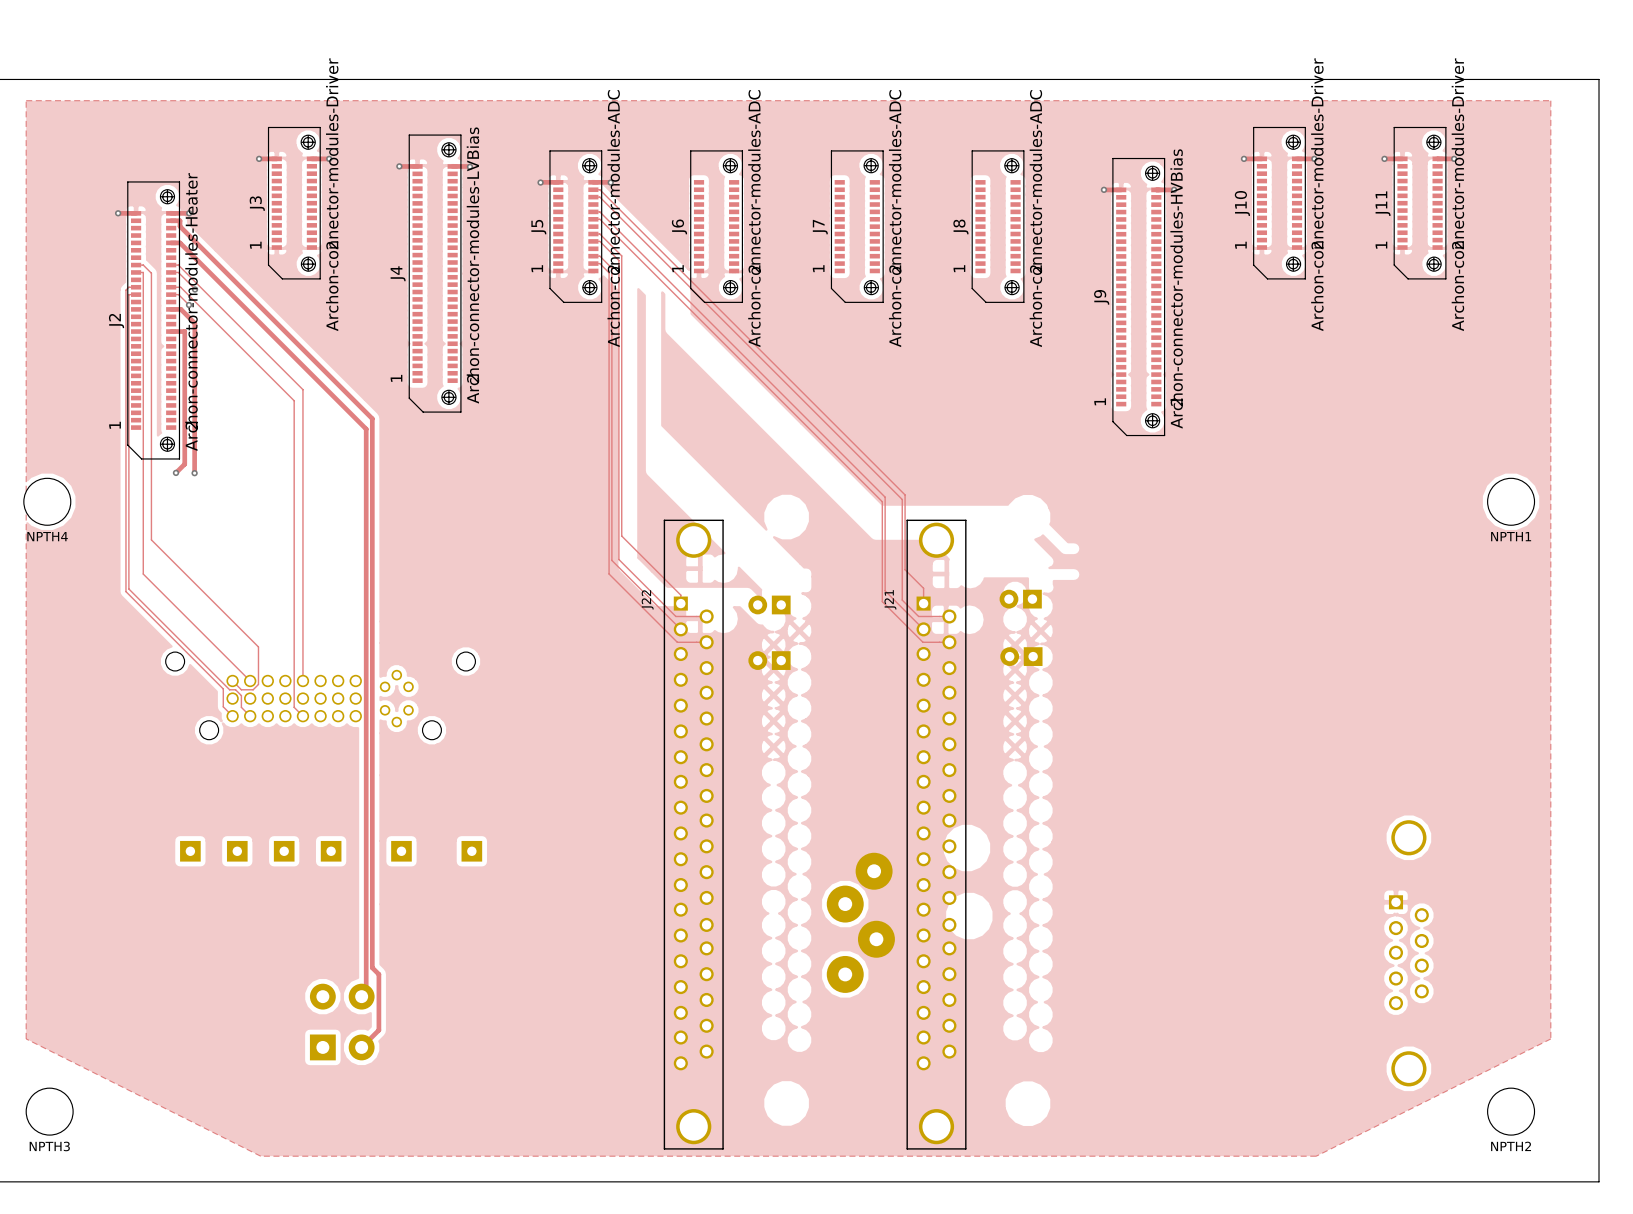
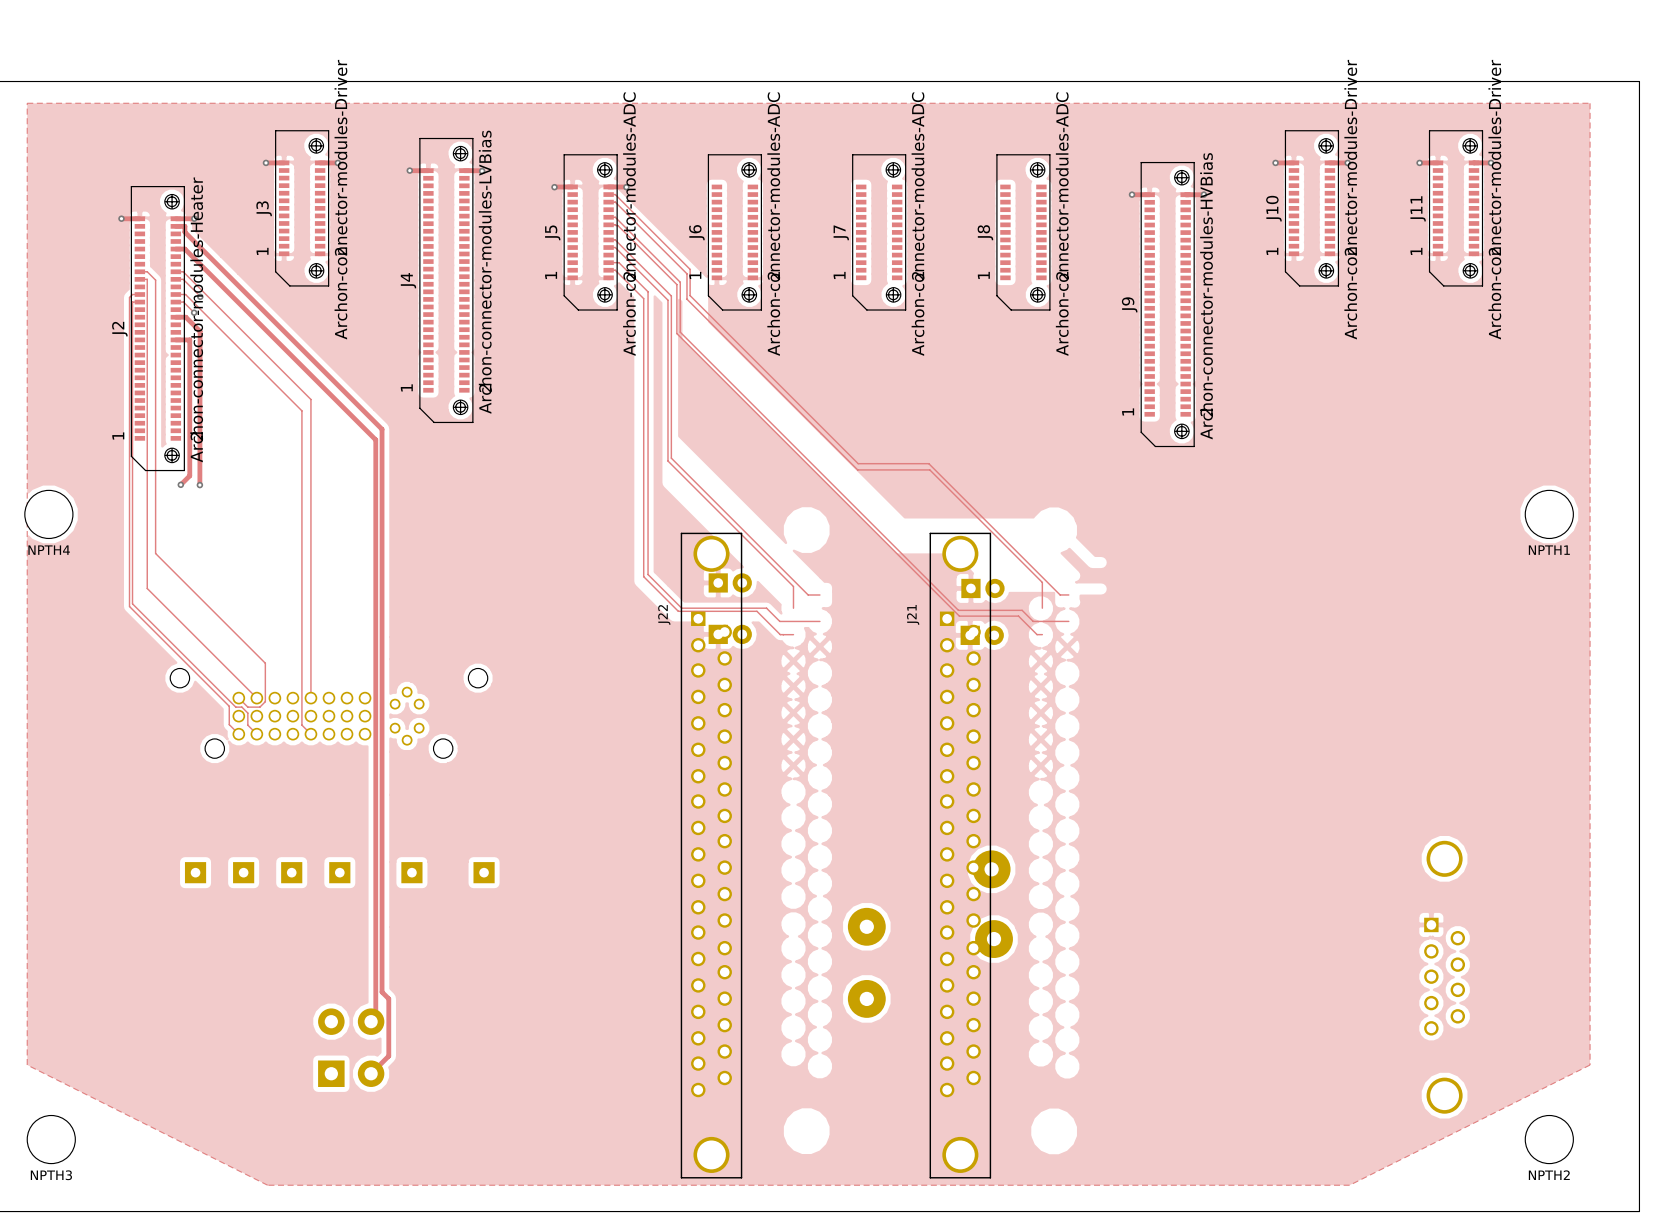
track: (600, 219) (882, 501) (882, 601) (922, 642) (949, 642) -> (616, 225) (676, 284) (676, 333) (959, 616) (1018, 616) (1037, 634) (1042, 634)
track: (621, 255) (621, 536) (680, 595) (680, 603) -> (637, 262) (671, 296) (671, 458) (808, 595) (819, 595)
track: (599, 256) (611, 268) (611, 560) (680, 629) -> (615, 262) (618, 262) (648, 291) (648, 574) (681, 608) (766, 608) (779, 621) (819, 621)
track: (618, 260) (618, 559) (675, 616) (706, 616) -> (634, 267) (667, 300) (667, 461) (793, 586) (793, 608)
track: (672, 262) (905, 494) (905, 569) (923, 588) (923, 603) -> (690, 269) (690, 295) (858, 463) (928, 463) (1060, 594) (1068, 594)
track: (669, 267) (902, 499) (902, 600) (918, 616) (949, 616) -> (686, 273) (686, 299) (857, 469) (929, 469) (1042, 582) (1042, 608)
track: (609, 272) (609, 574) (677, 642) (706, 642) -> (624, 279) (643, 298) (643, 576) (678, 611) (756, 611) (780, 634) (783, 634)
track: (663, 275) (885, 497) (885, 590) (923, 629) -> (680, 282) (680, 332) (958, 610) (1022, 610) (1033, 621) (1068, 621)
part: none -> (730, 582)
part: none -> (982, 588)
part: (1020, 599) -> none
part: (769, 604) -> none
part: none -> (730, 634)
track: none -> (783, 634) (793, 634)
part: none -> (982, 635)
part: (1021, 656) -> none
part: (769, 660) -> none
part: none -> (991, 869)
part: (874, 871) -> none
part: none -> (994, 939)
part: (876, 939) -> none

